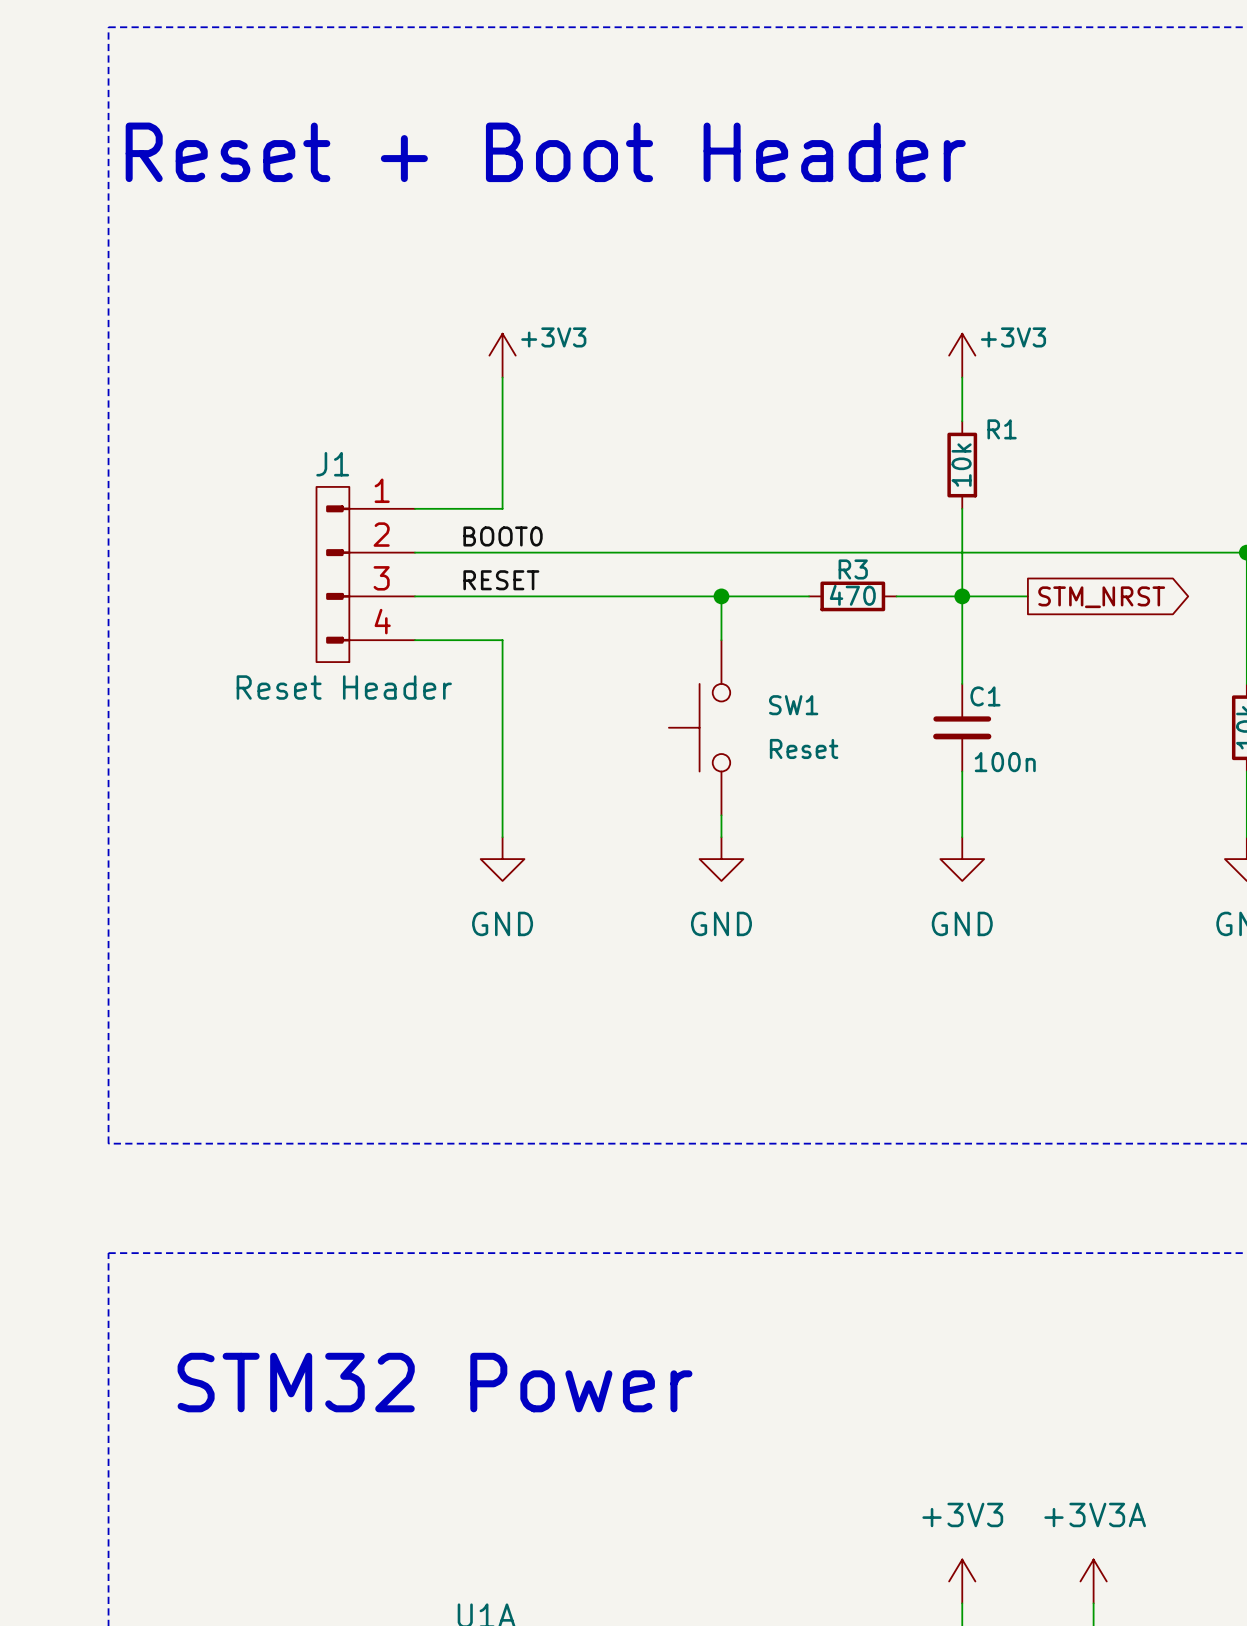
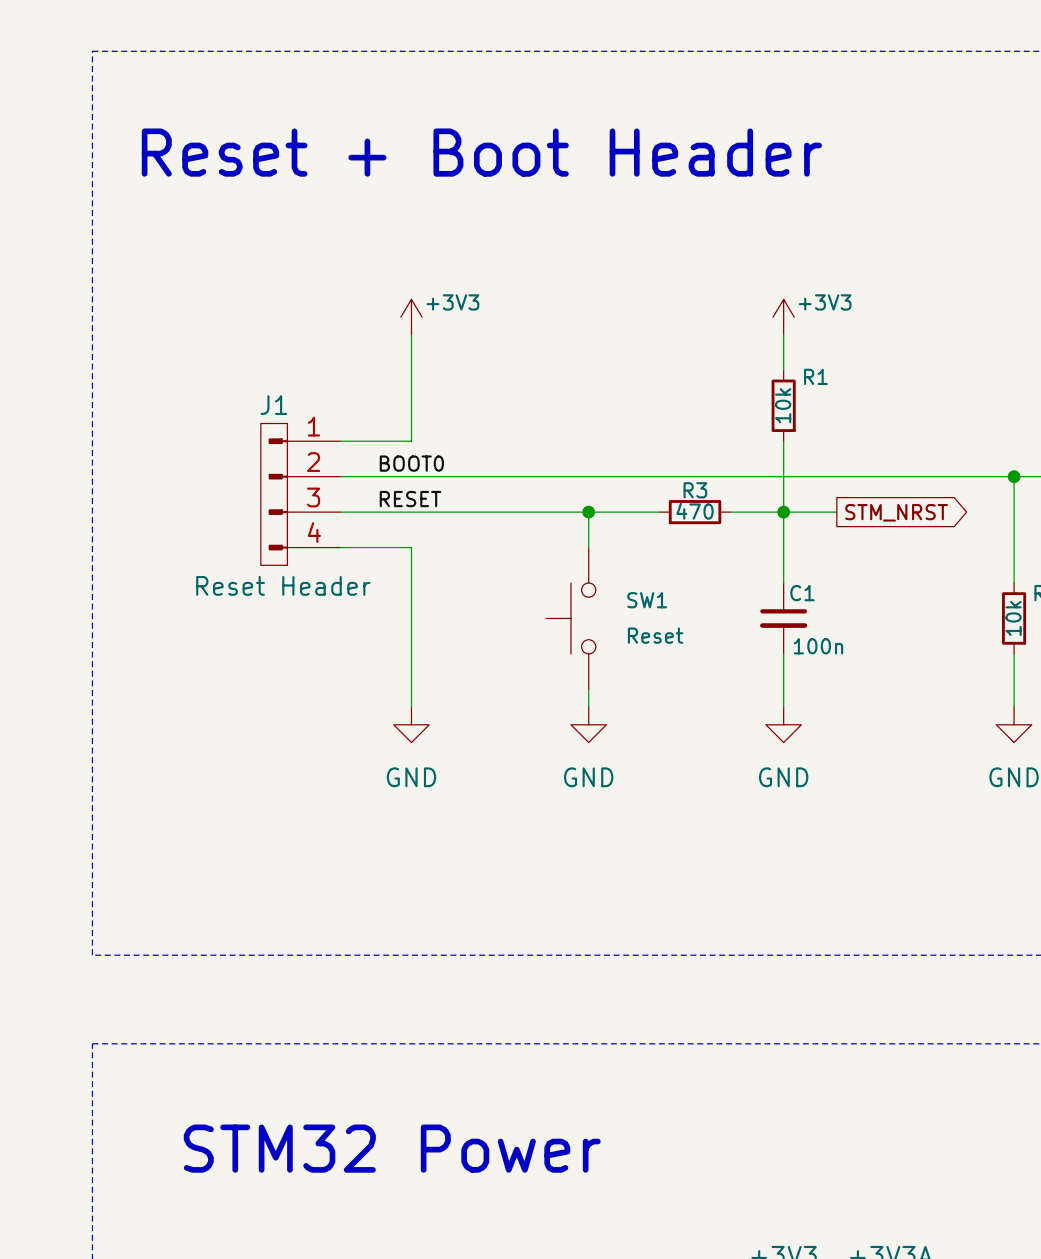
text position: Reset + Boot Header (545, 152) -> Reset + Boot Header (481, 152)
text position: STM32 Power (435, 1382) -> STM32 Power (392, 1148)

